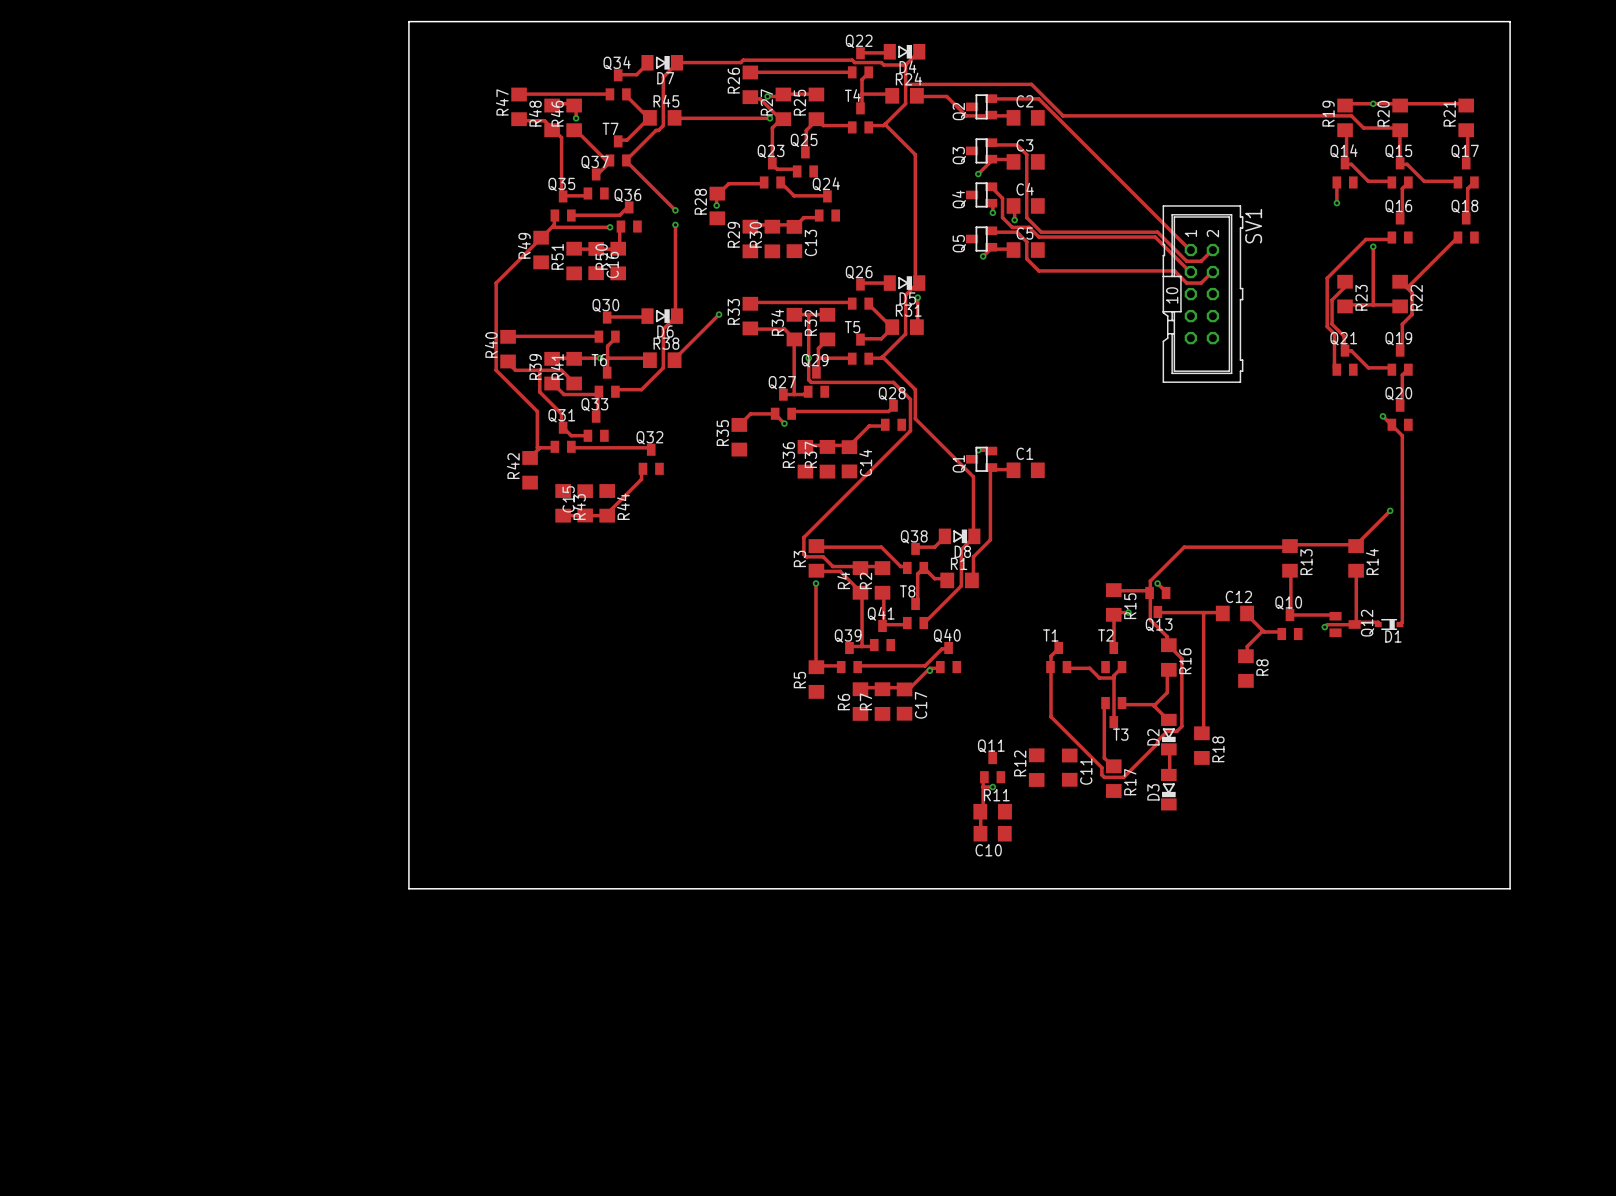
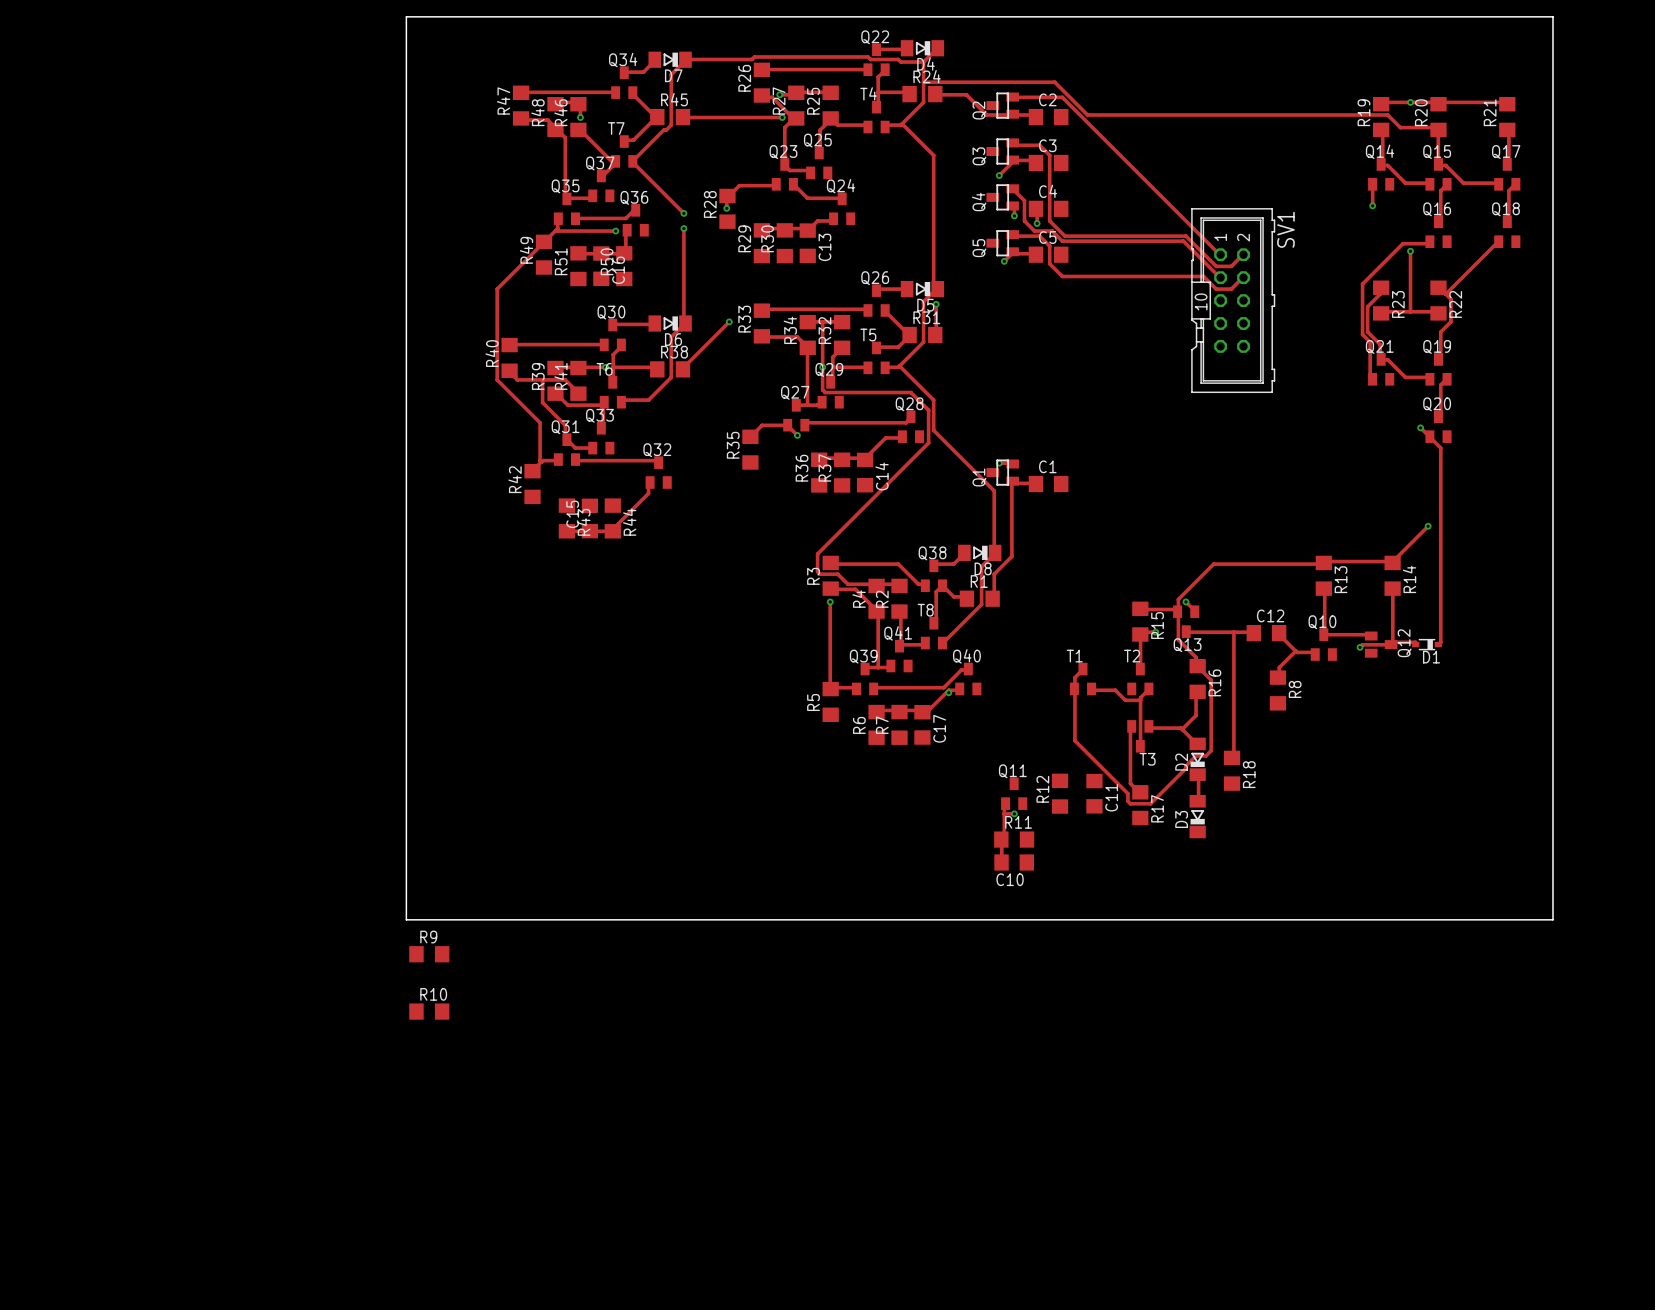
R9: none -> (429, 954)
R10: none -> (429, 1011)

